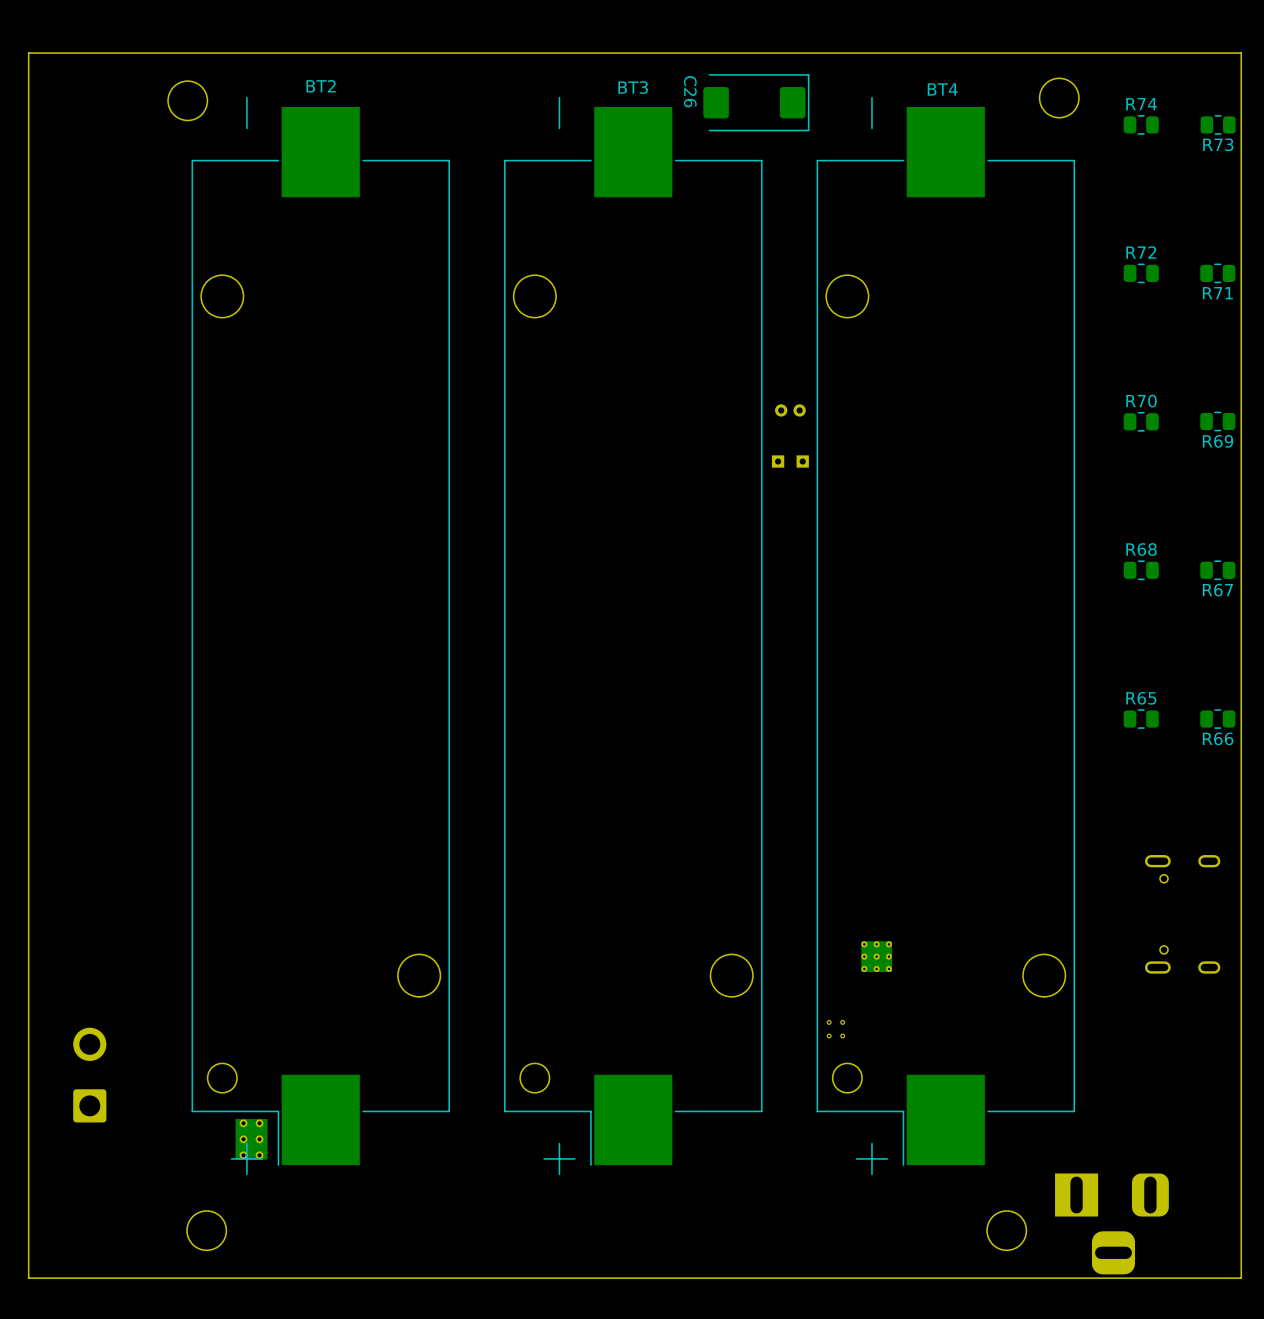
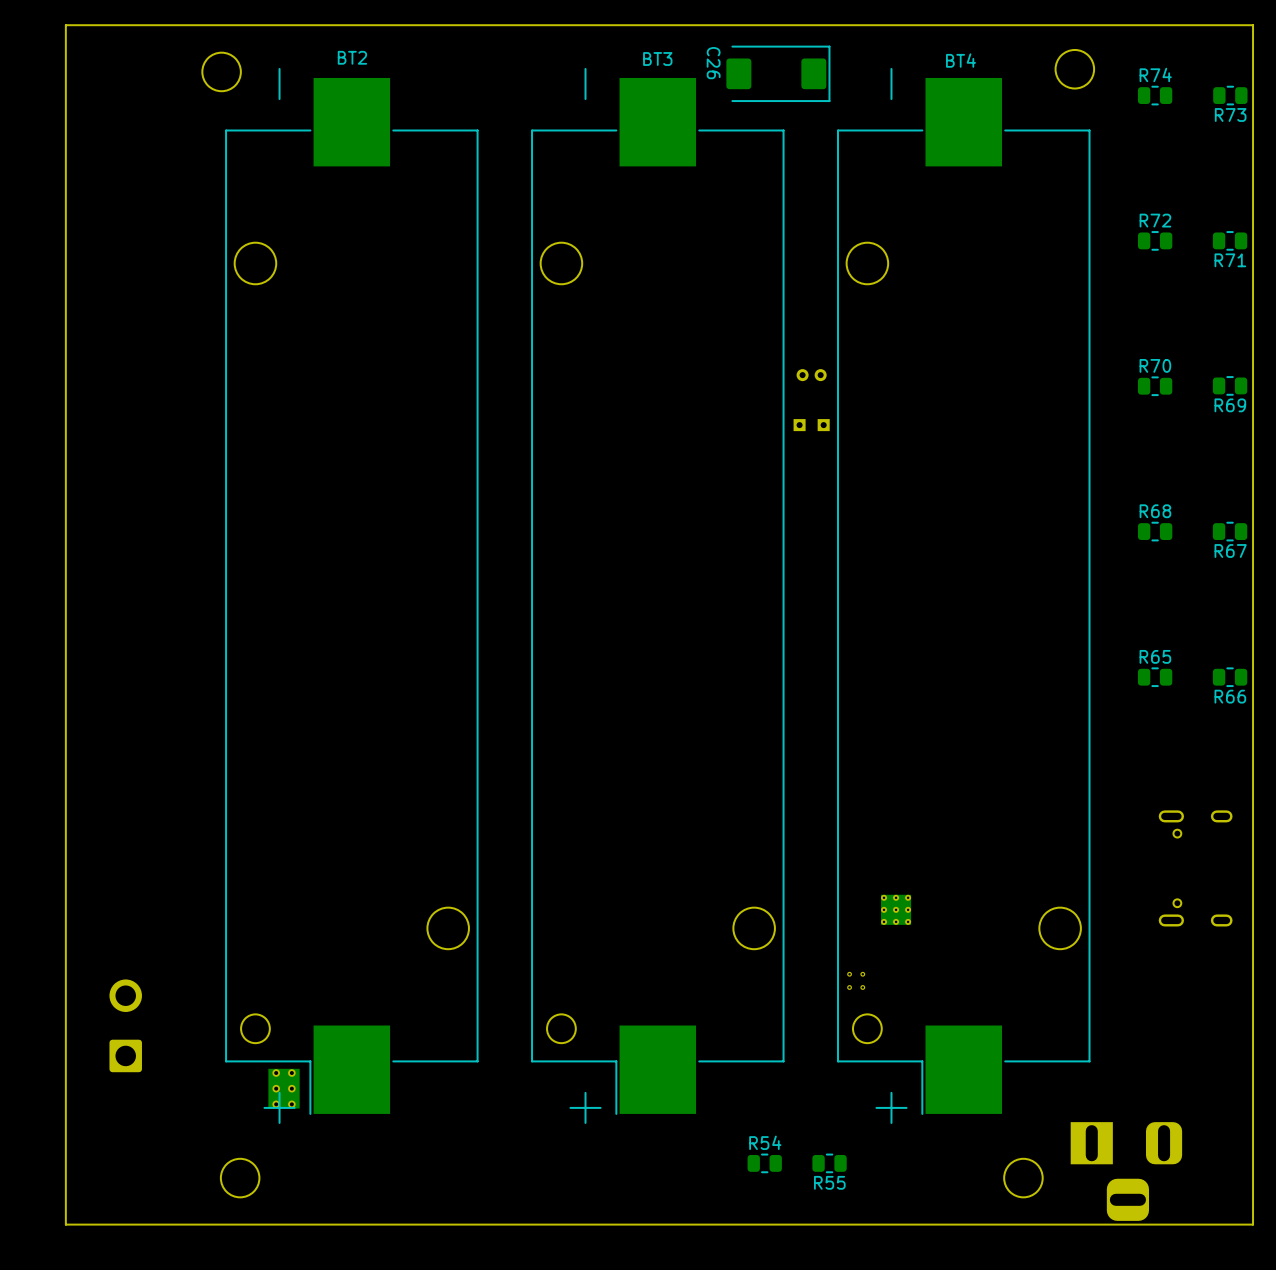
R54: none -> (764, 1163)
R55: none -> (829, 1163)

